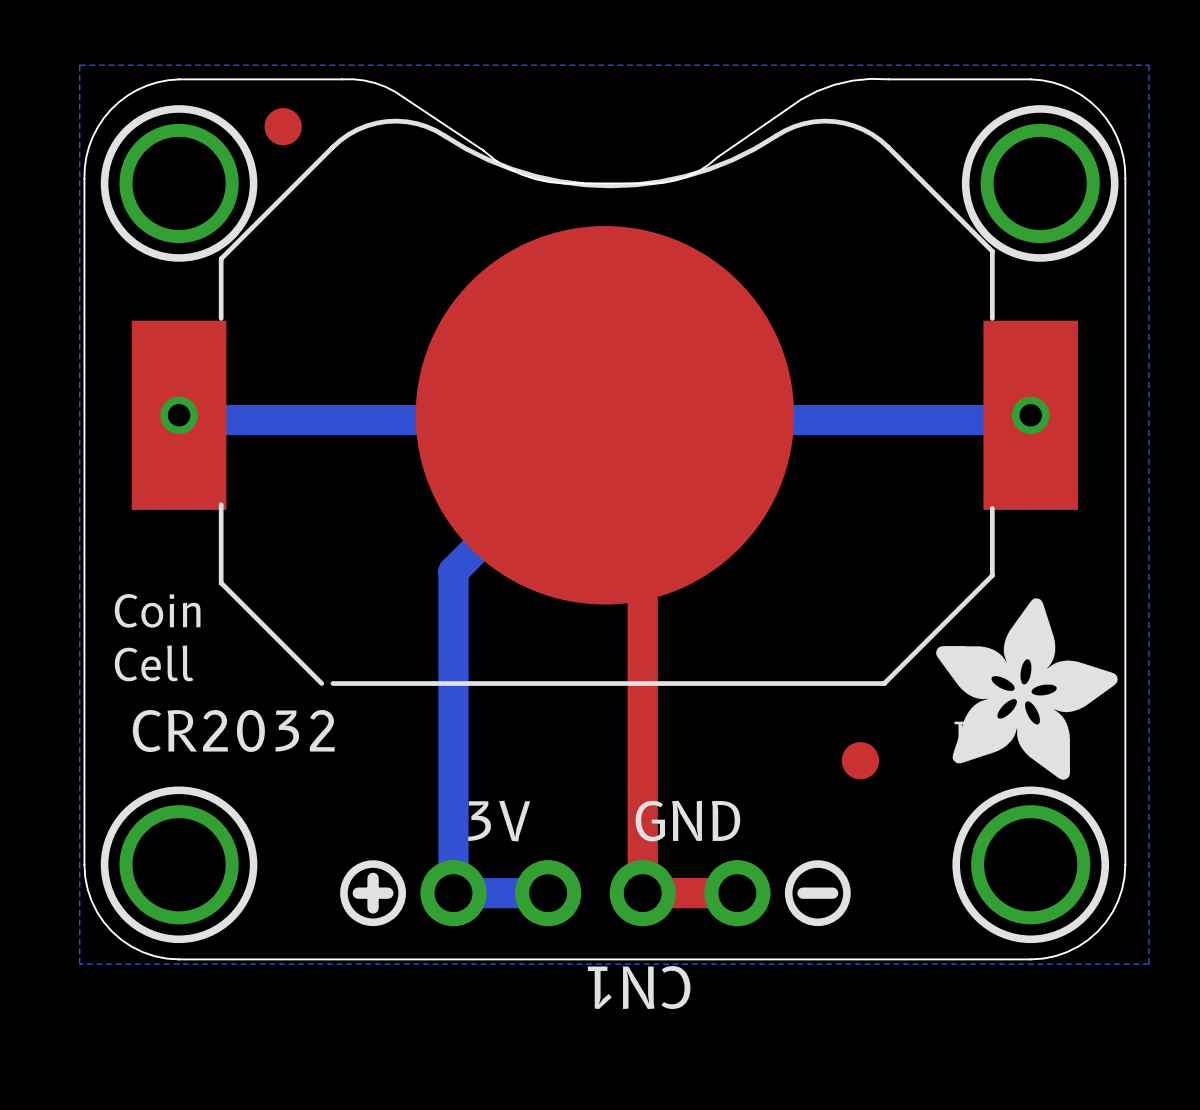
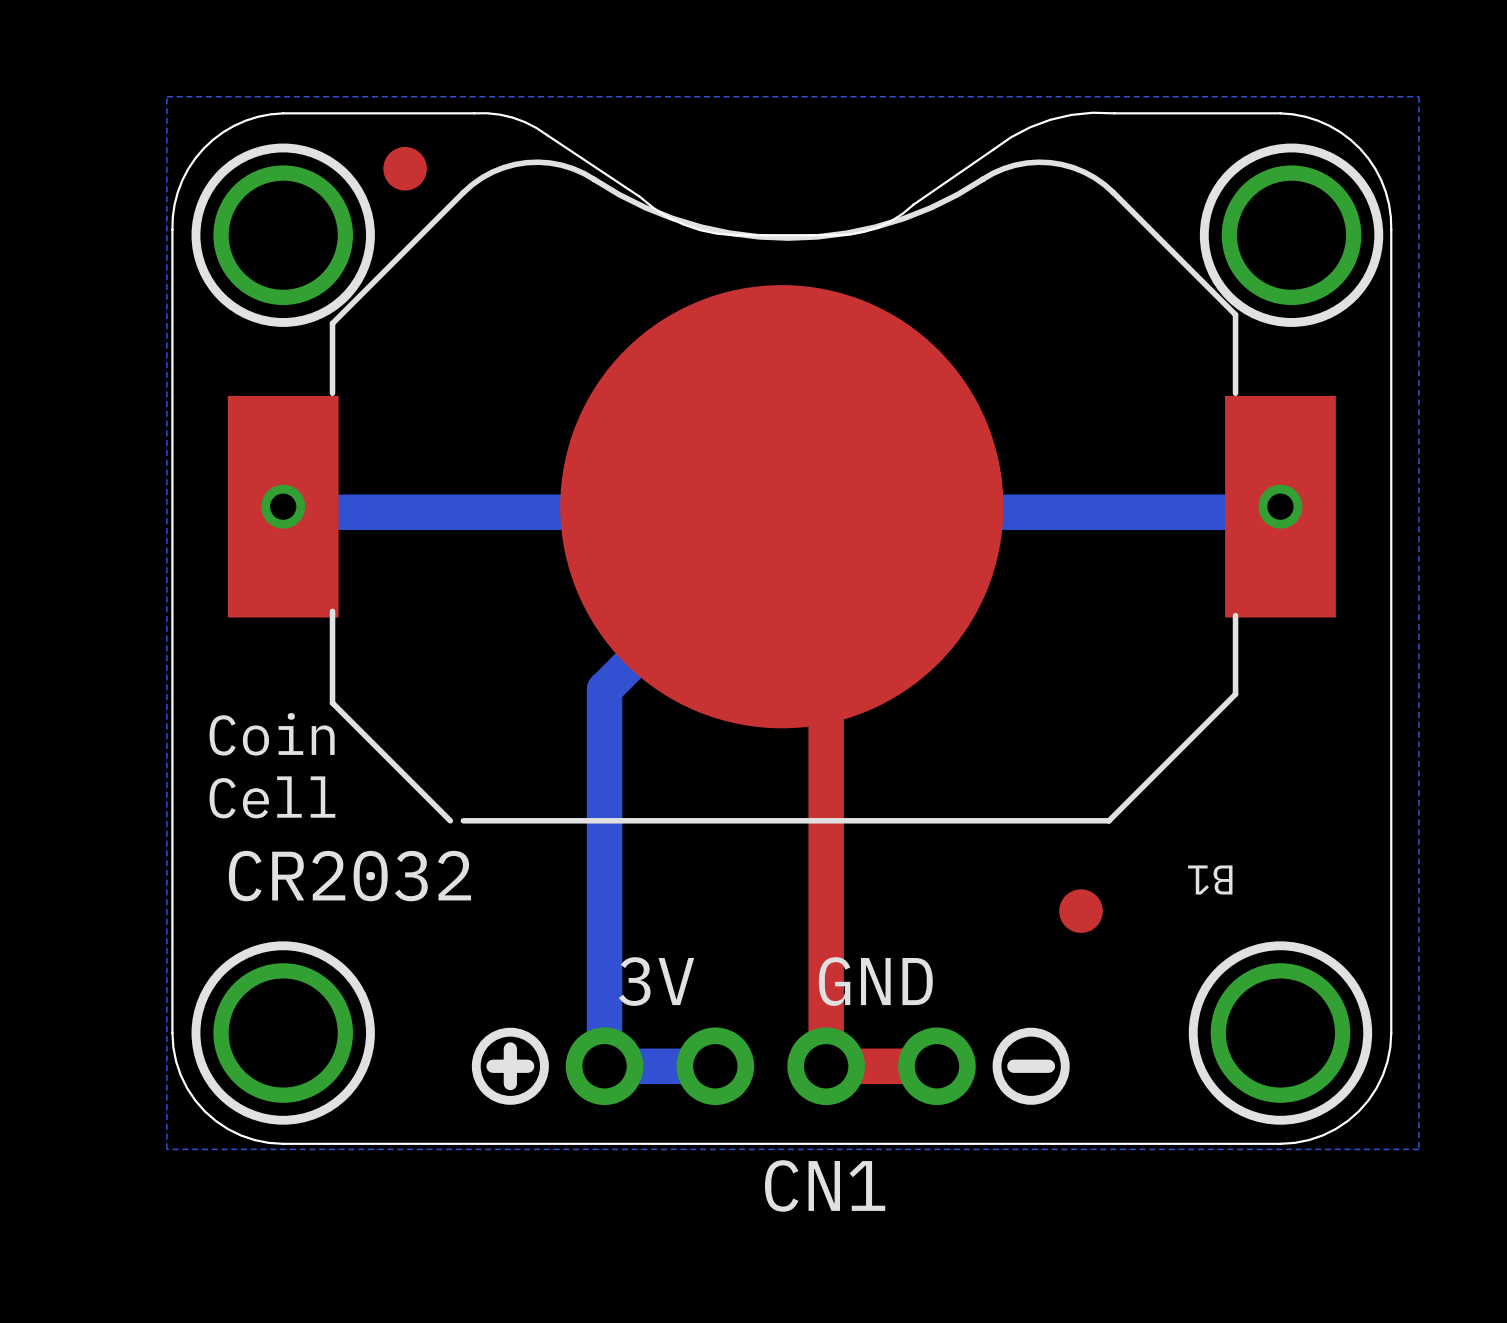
drawing: [935, 598, 1118, 780] -> none
CN1 name rotation: 0° (639, 987) -> 180° (825, 1185)

